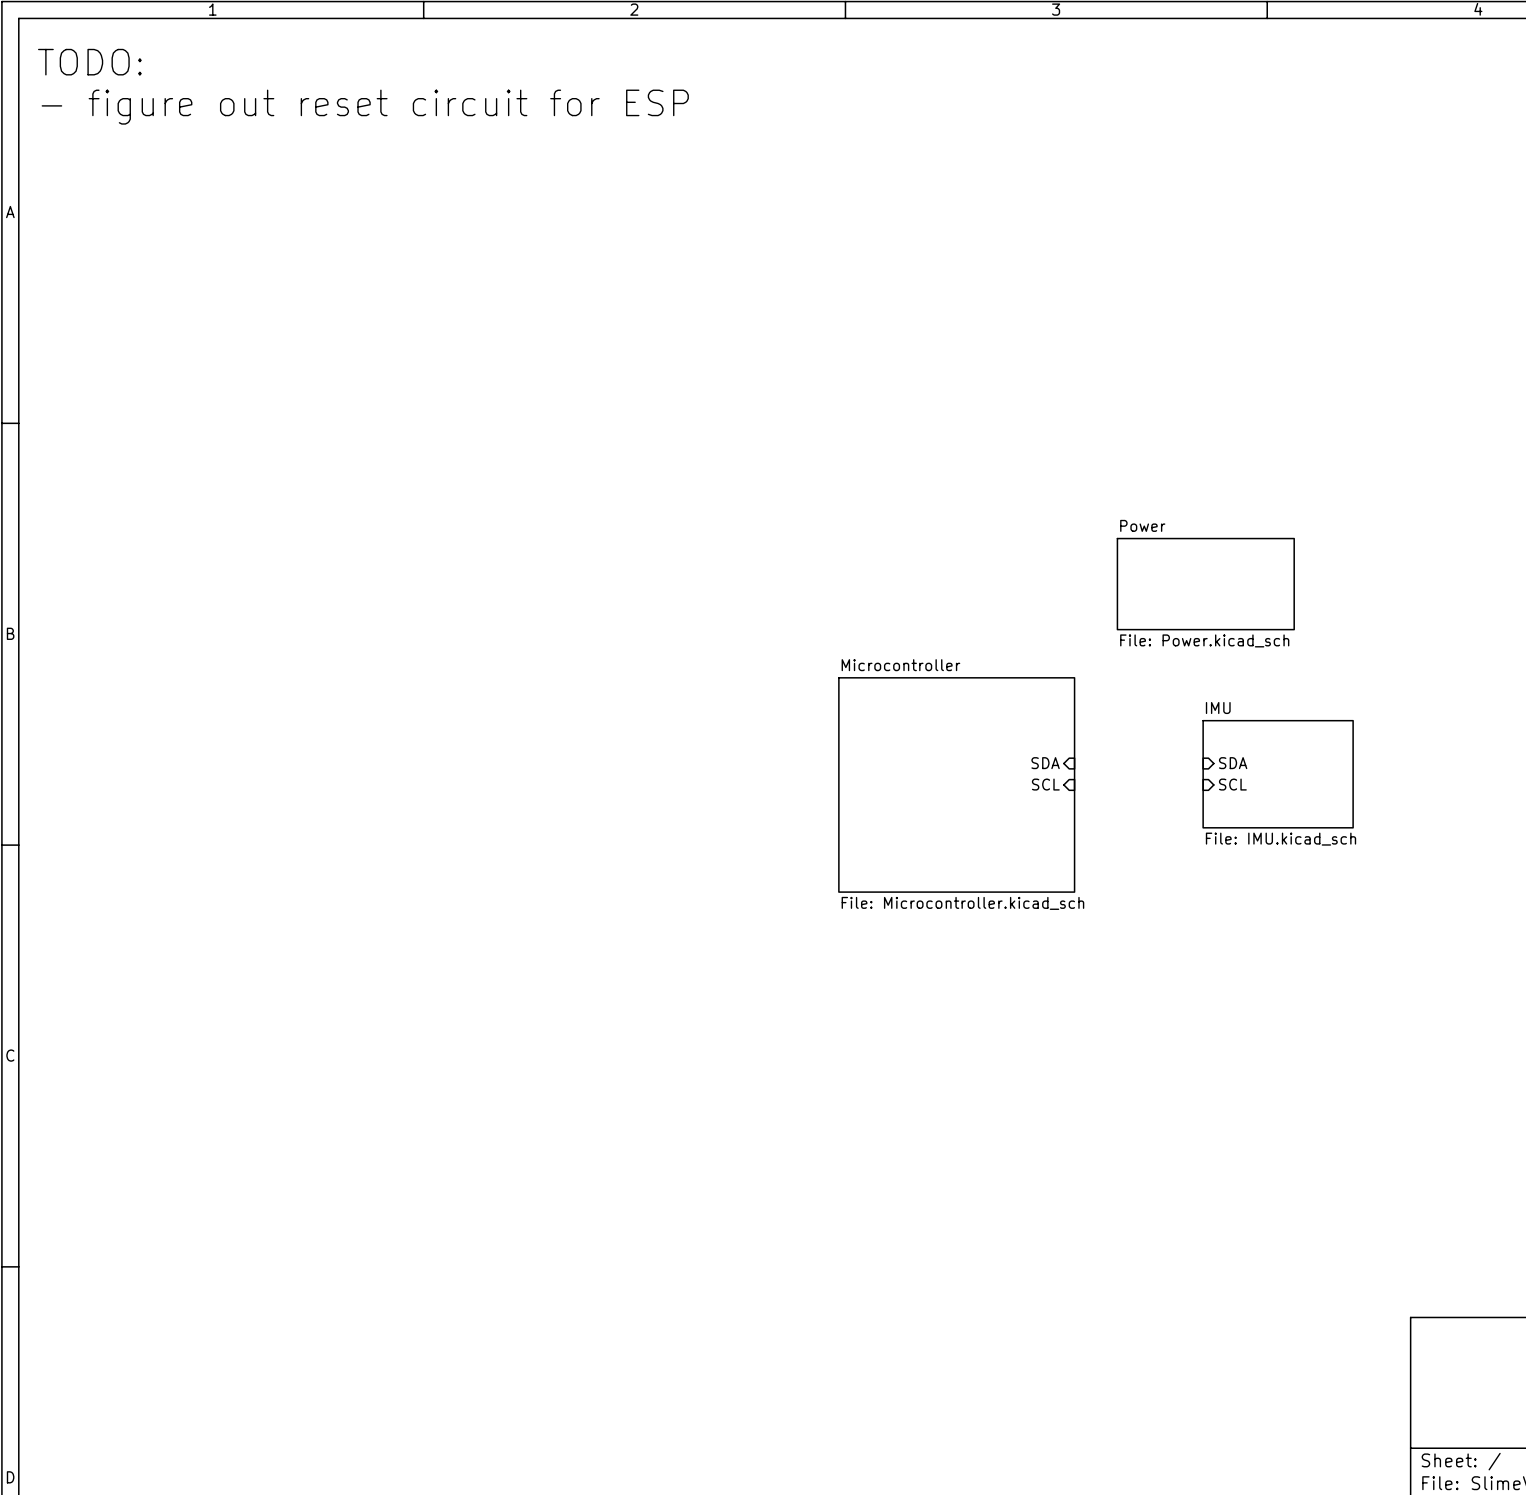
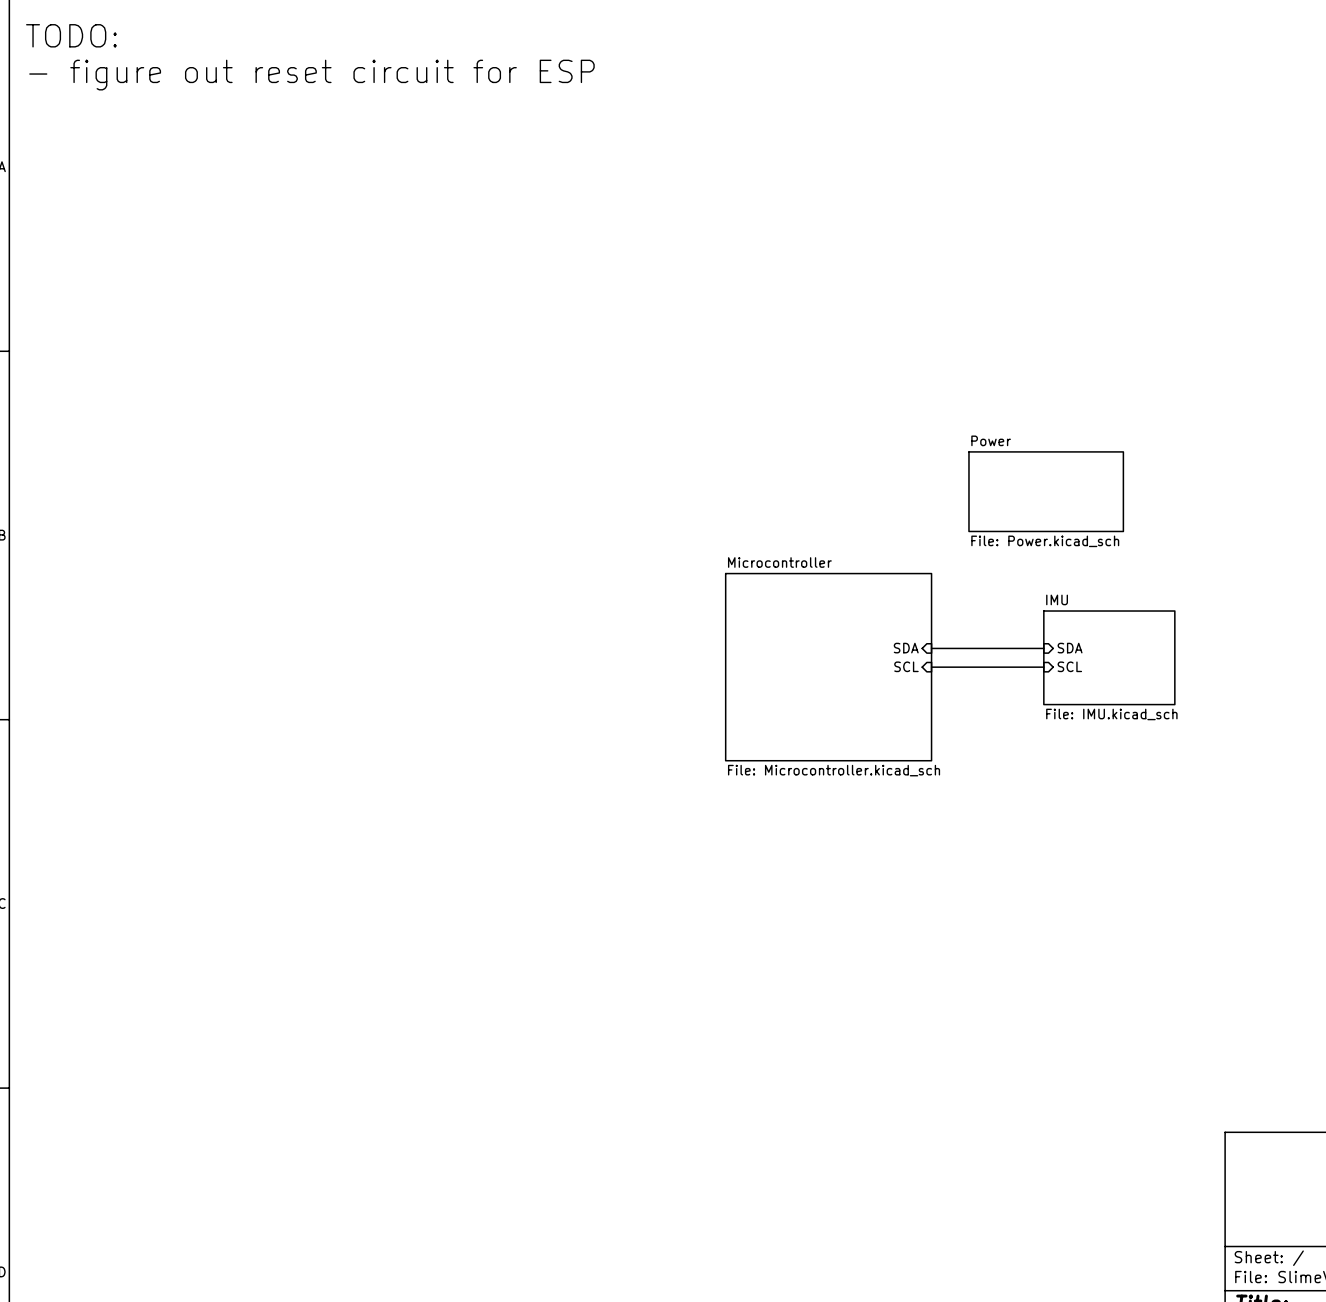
wire: none -> (931, 648) (1043, 648)
wire: none -> (931, 667) (1043, 667)

